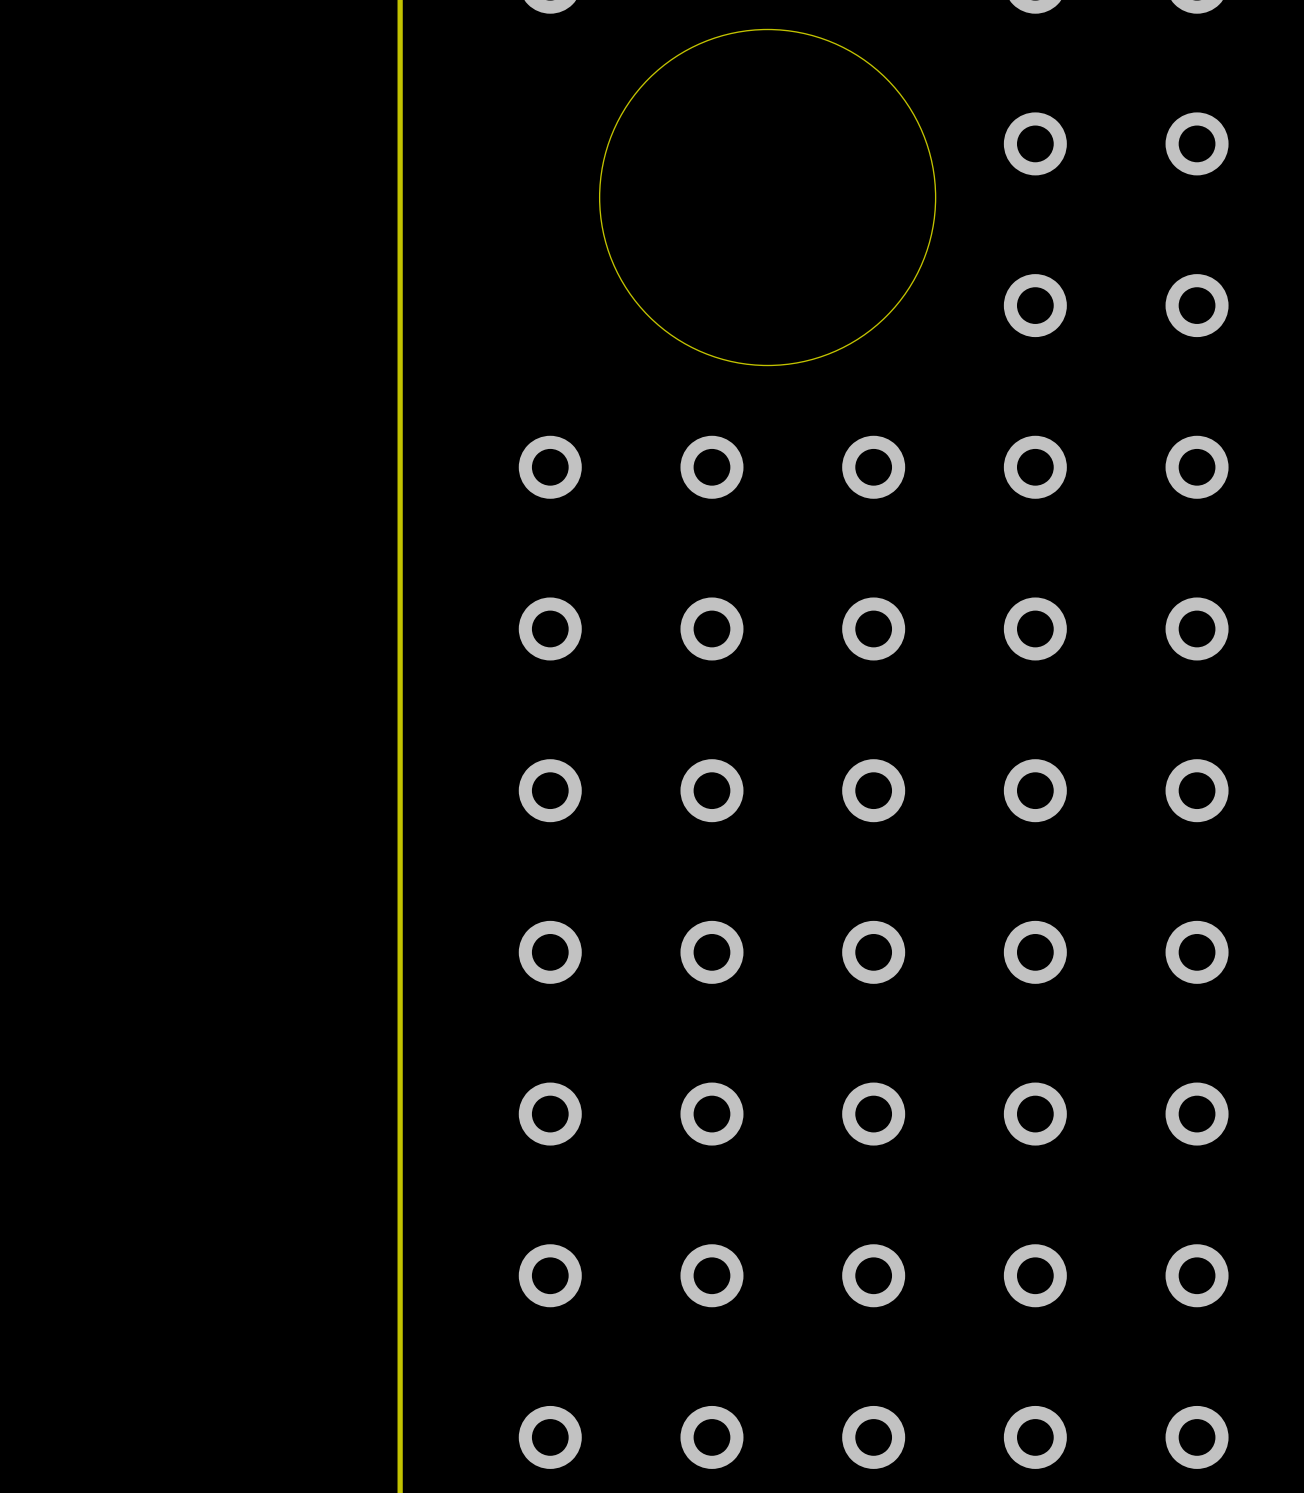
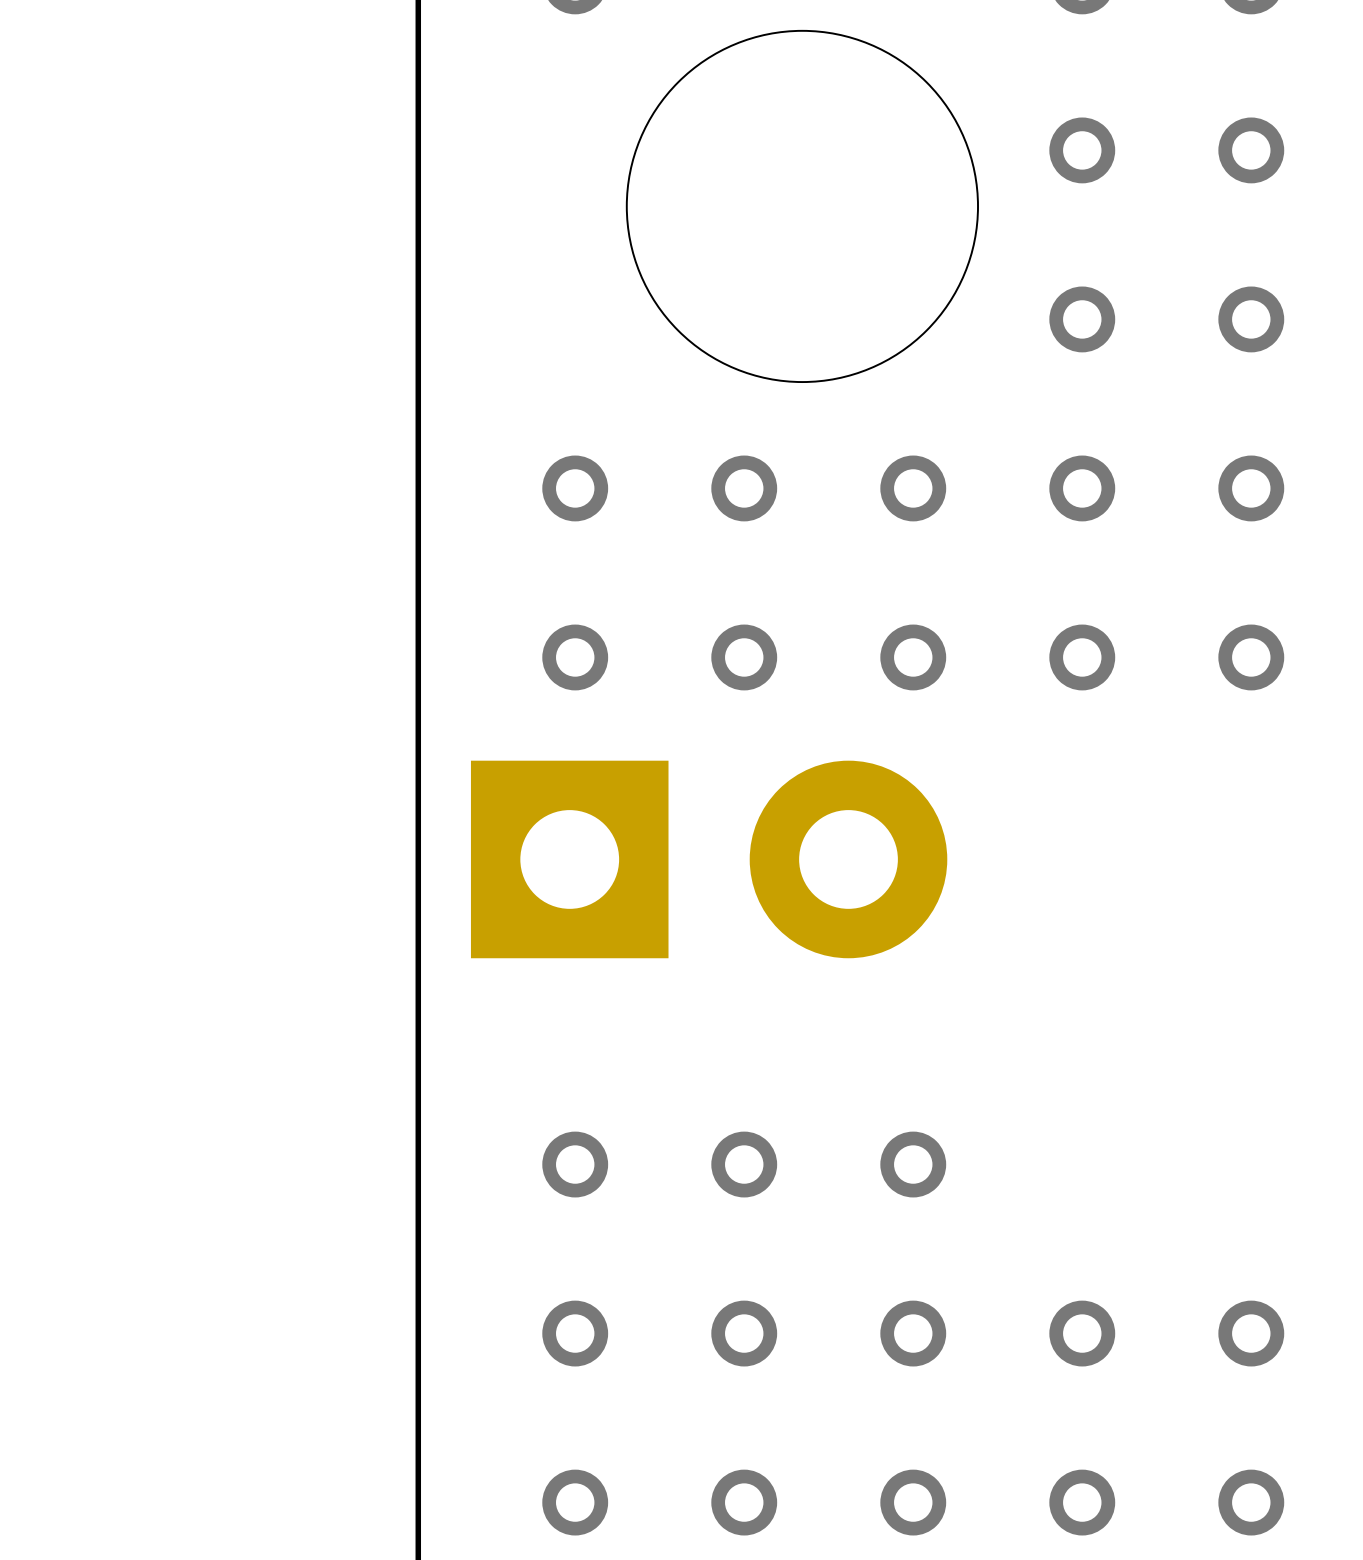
via: (550, 790) -> none
via: (711, 790) -> none
via: (873, 790) -> none
via: (1035, 790) -> none
via: (1197, 790) -> none
part: none -> (709, 859)
via: (550, 952) -> none
via: (711, 952) -> none
via: (873, 952) -> none
via: (1035, 952) -> none
via: (1197, 952) -> none
via: (1035, 1114) -> none
via: (1197, 1114) -> none

